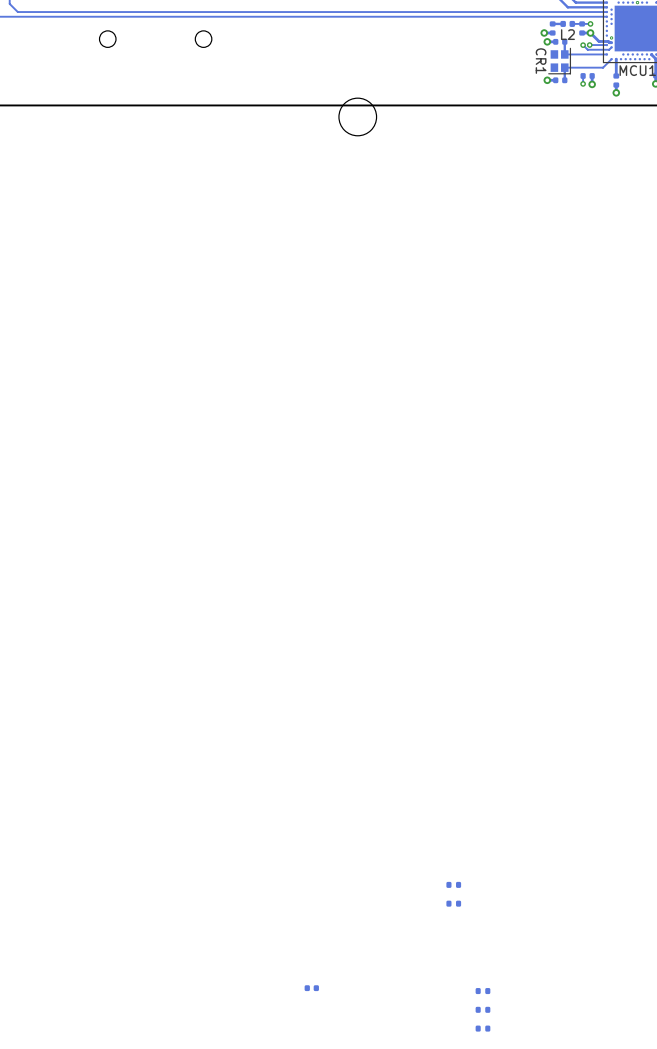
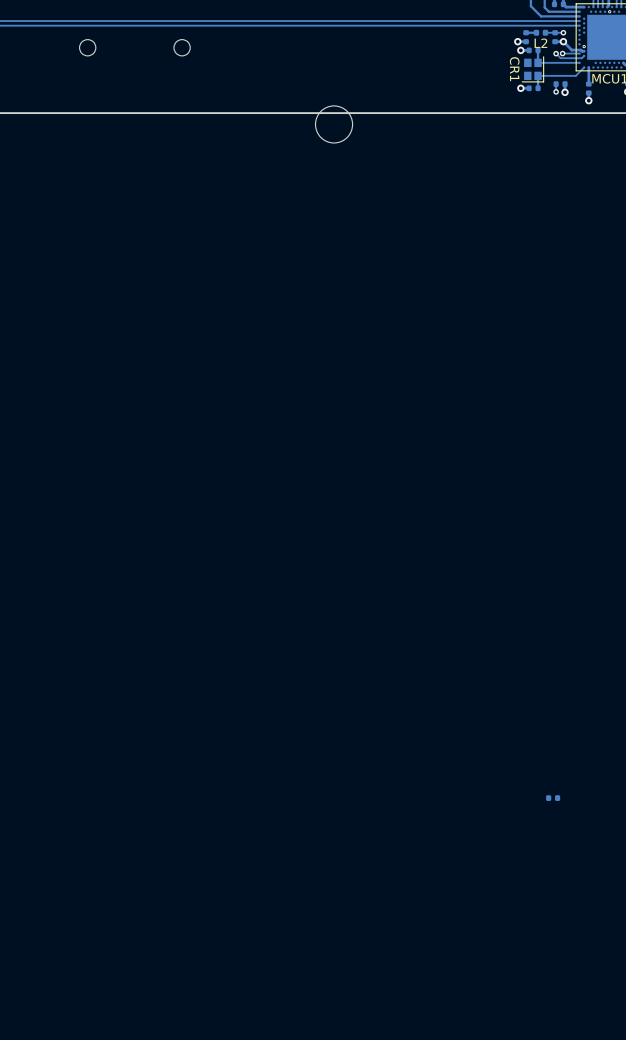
part: none -> (553, 798)
part: (453, 884) -> none
part: (453, 903) -> none
part: (311, 988) -> none
part: (482, 991) -> none
part: (482, 1009) -> none
part: (482, 1028) -> none

